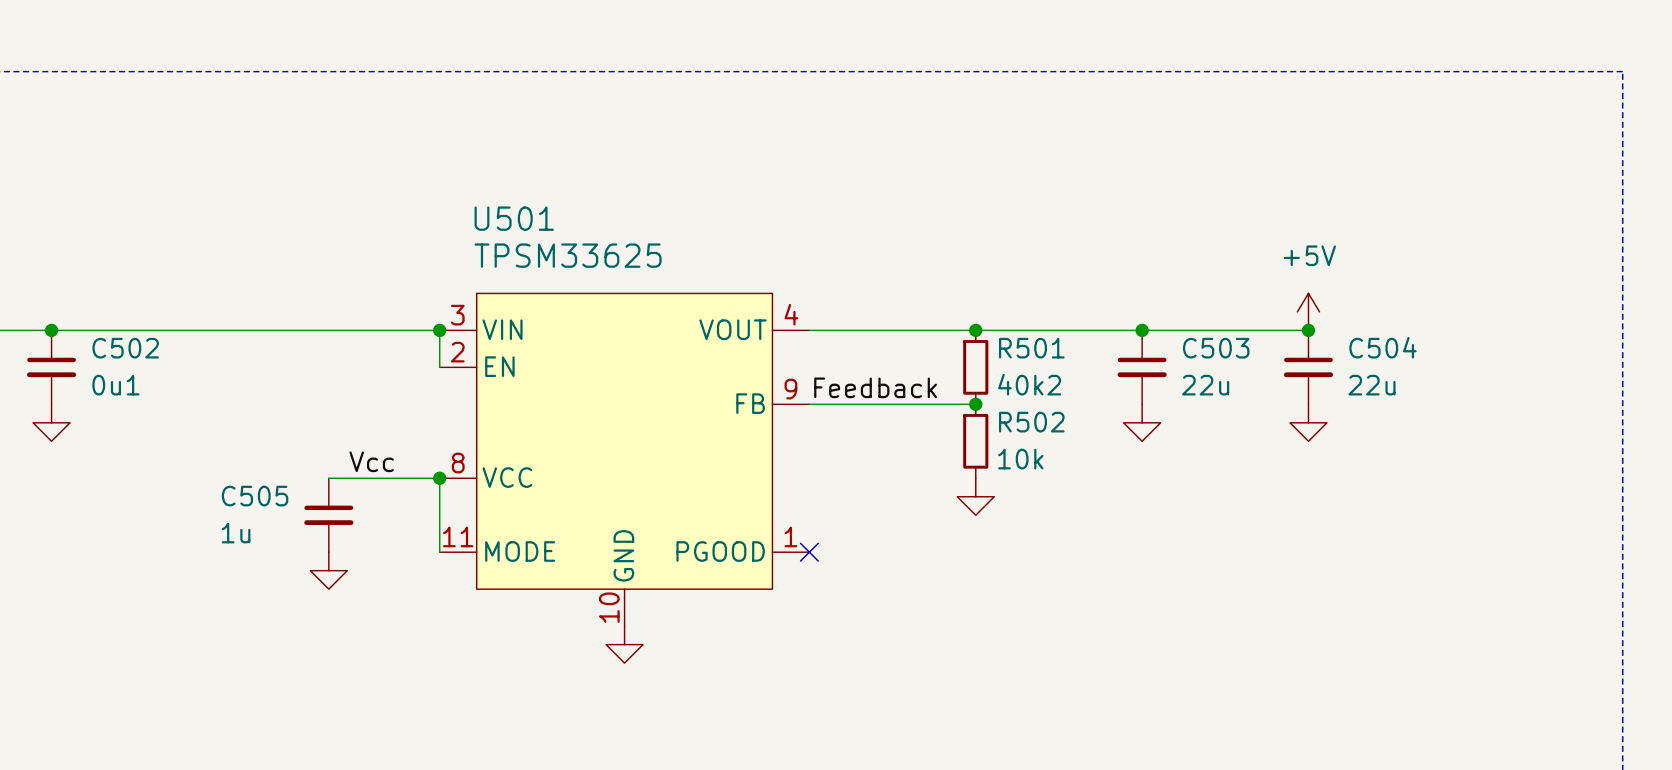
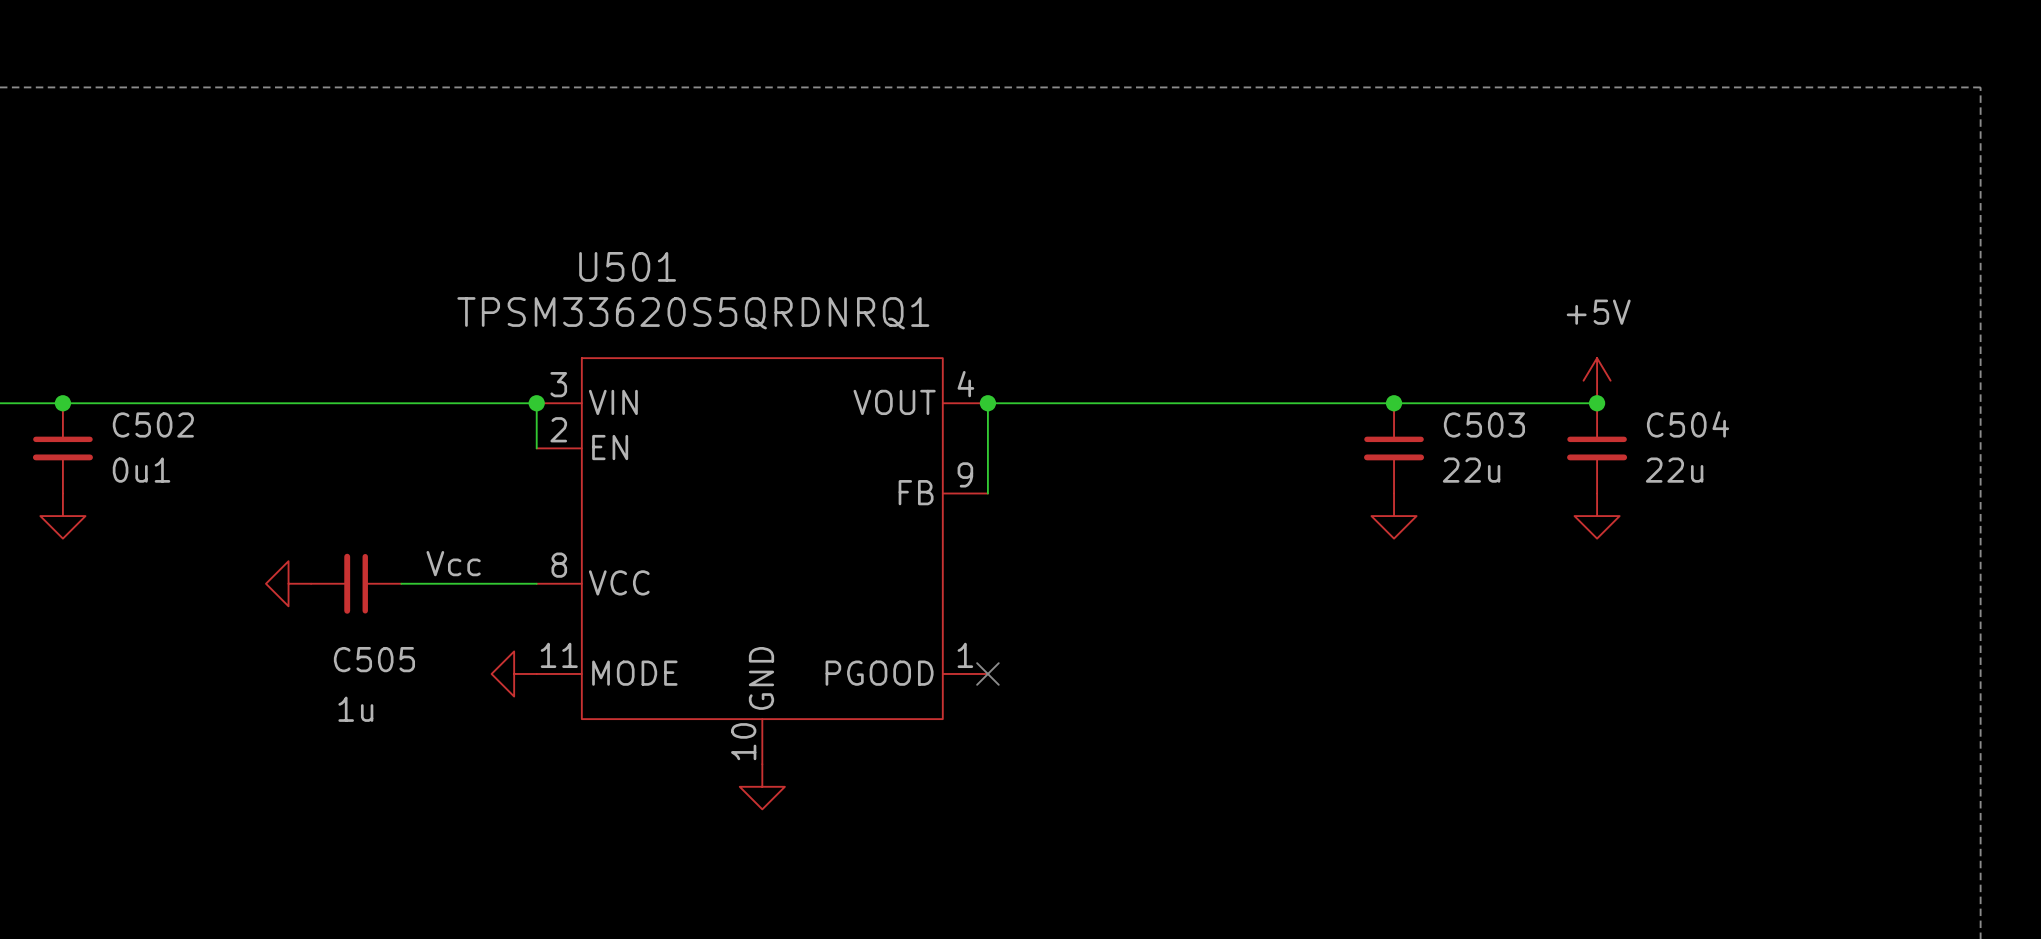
U501 value: TPSM33625 (568, 255) -> TPSM33620S5QRDNRQ1 (693, 313)
junction: none -> (987, 403)
junction: (975, 330) -> none
R501: 40k2 (975, 367) -> none
label: Feedback (875, 387) -> none
wire: (809, 404) (975, 404) -> (987, 493) (987, 403)
junction: (975, 404) -> none
R502: 10k (975, 441) -> none
power symbol: none -> (288, 583)
wire: (439, 478) (439, 552) -> none
junction: (439, 478) -> none
C505 name position: C505 (255, 496) -> C505 (374, 659)
power symbol: (975, 496) -> none
C505 rotation: 0° (328, 515) -> 90° clockwise (356, 583)
C505 position: (328, 515) -> (356, 583)
C505 value position: 1u (236, 533) -> 1u (355, 709)
power symbol: none -> (514, 673)
power symbol: (328, 570) -> none

